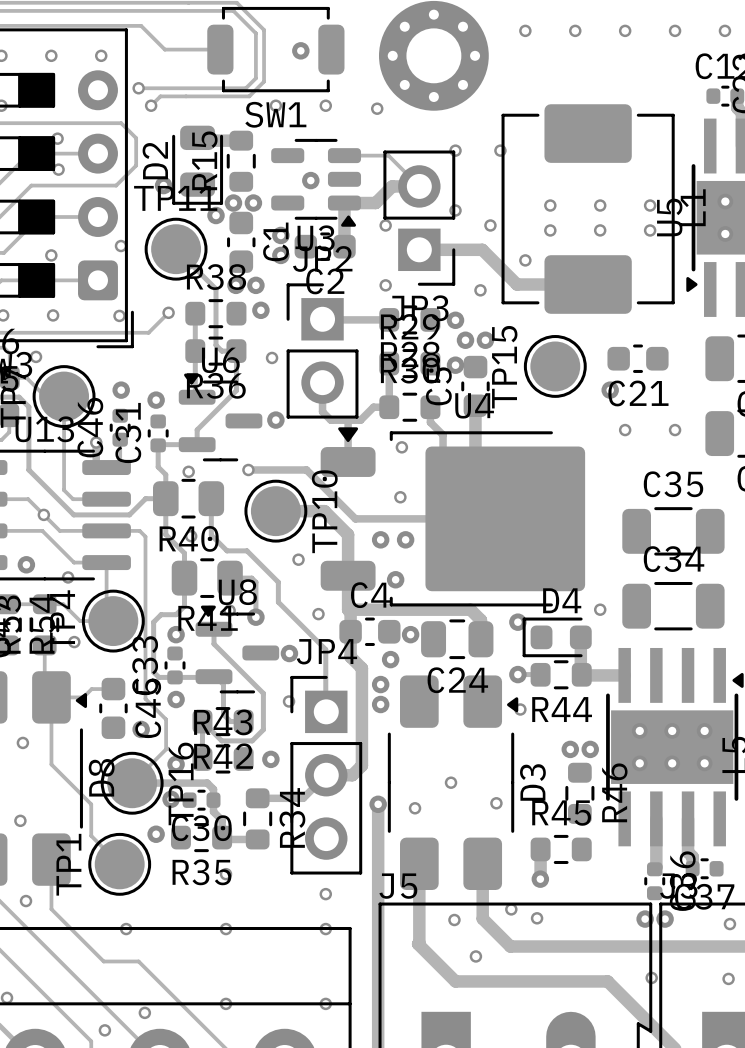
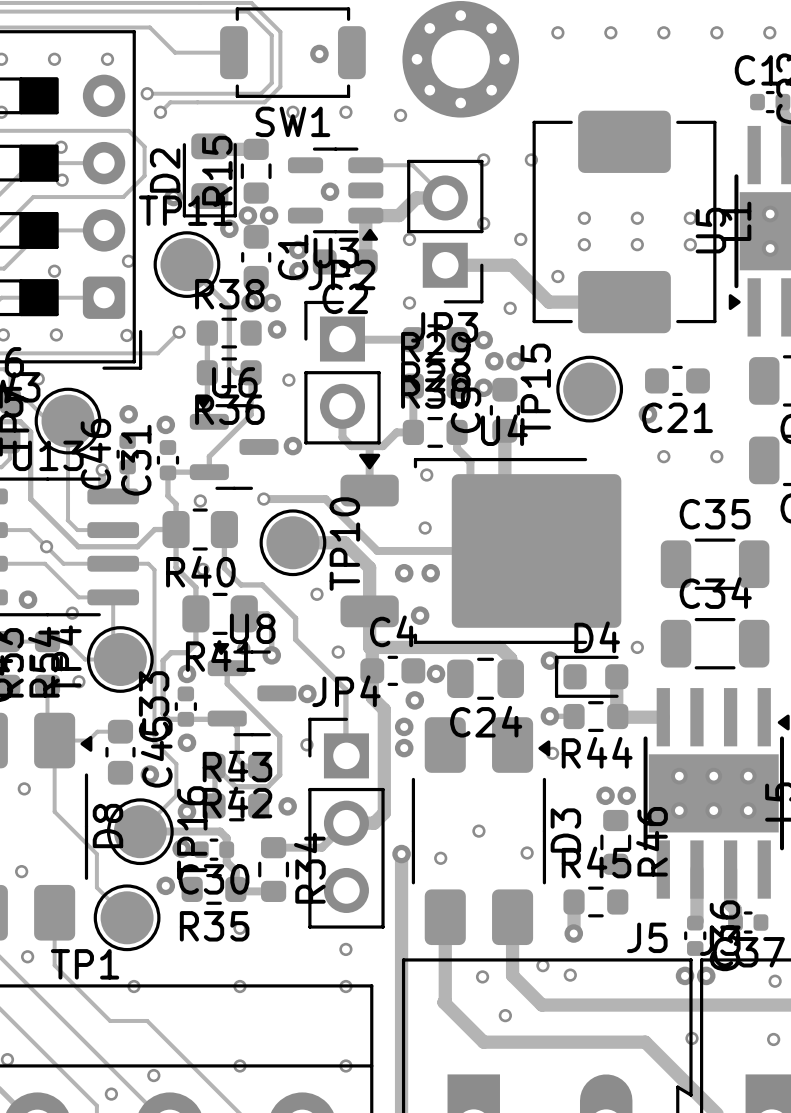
TP1 name rotation: 0° (68, 864) -> 90° clockwise (85, 964)
J5 name position: J5 (398, 886) -> J5 (647, 937)

